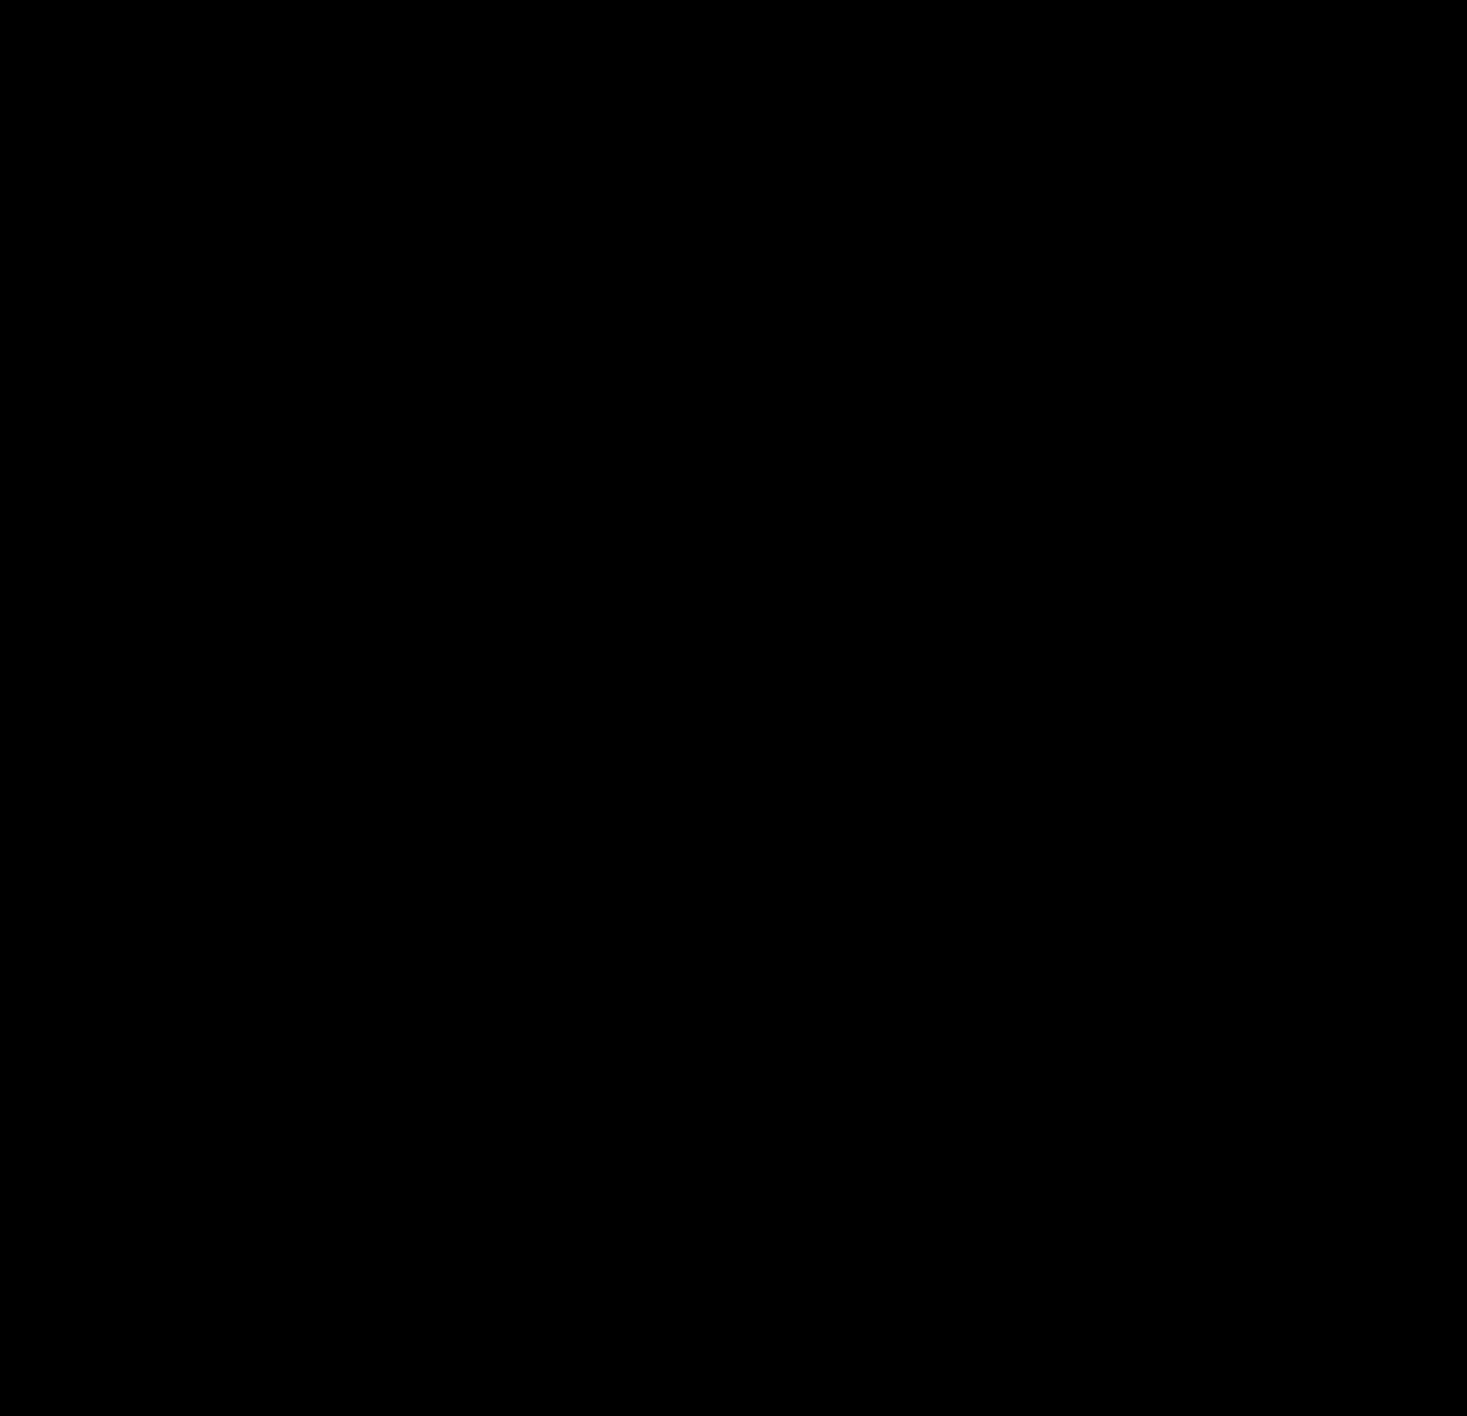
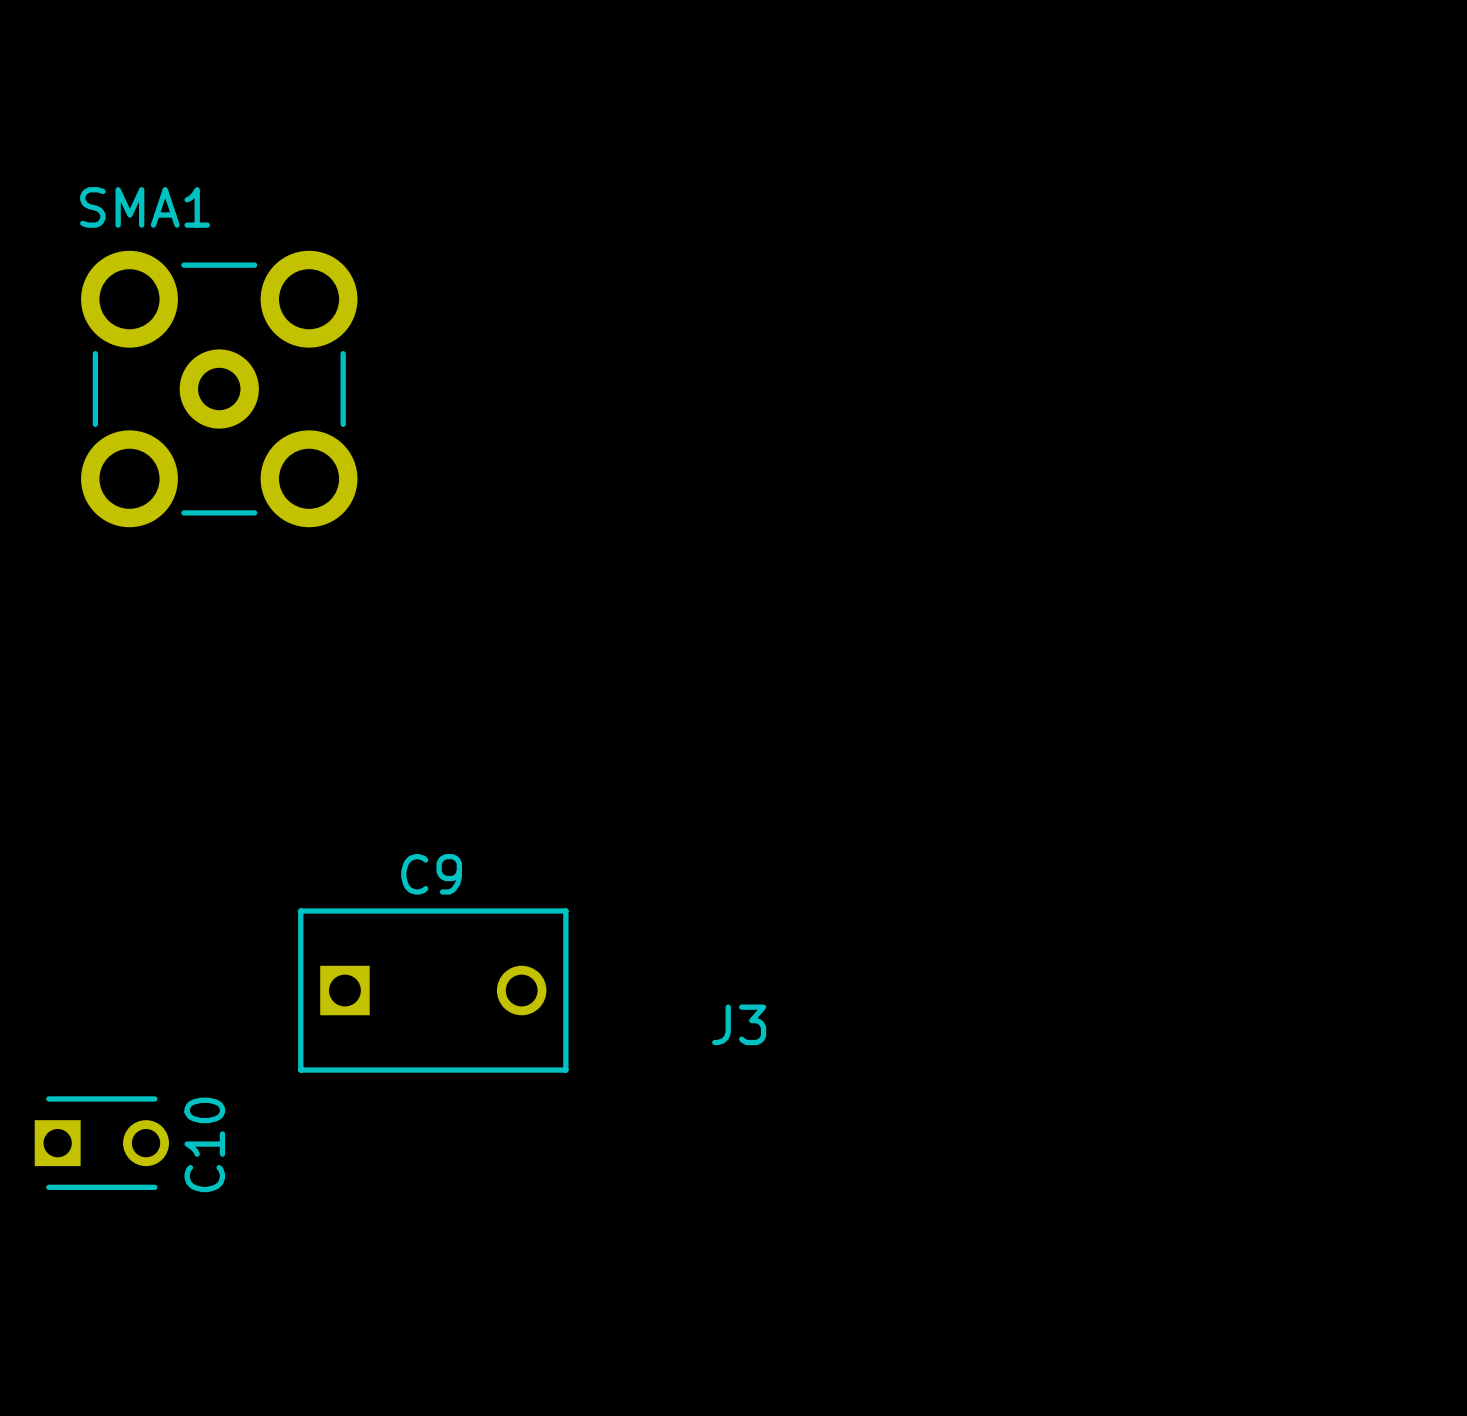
SMA1: none -> (219, 389)
C9: none -> (433, 990)
J3: none -> (739, 1024)
C10: none -> (101, 1143)

